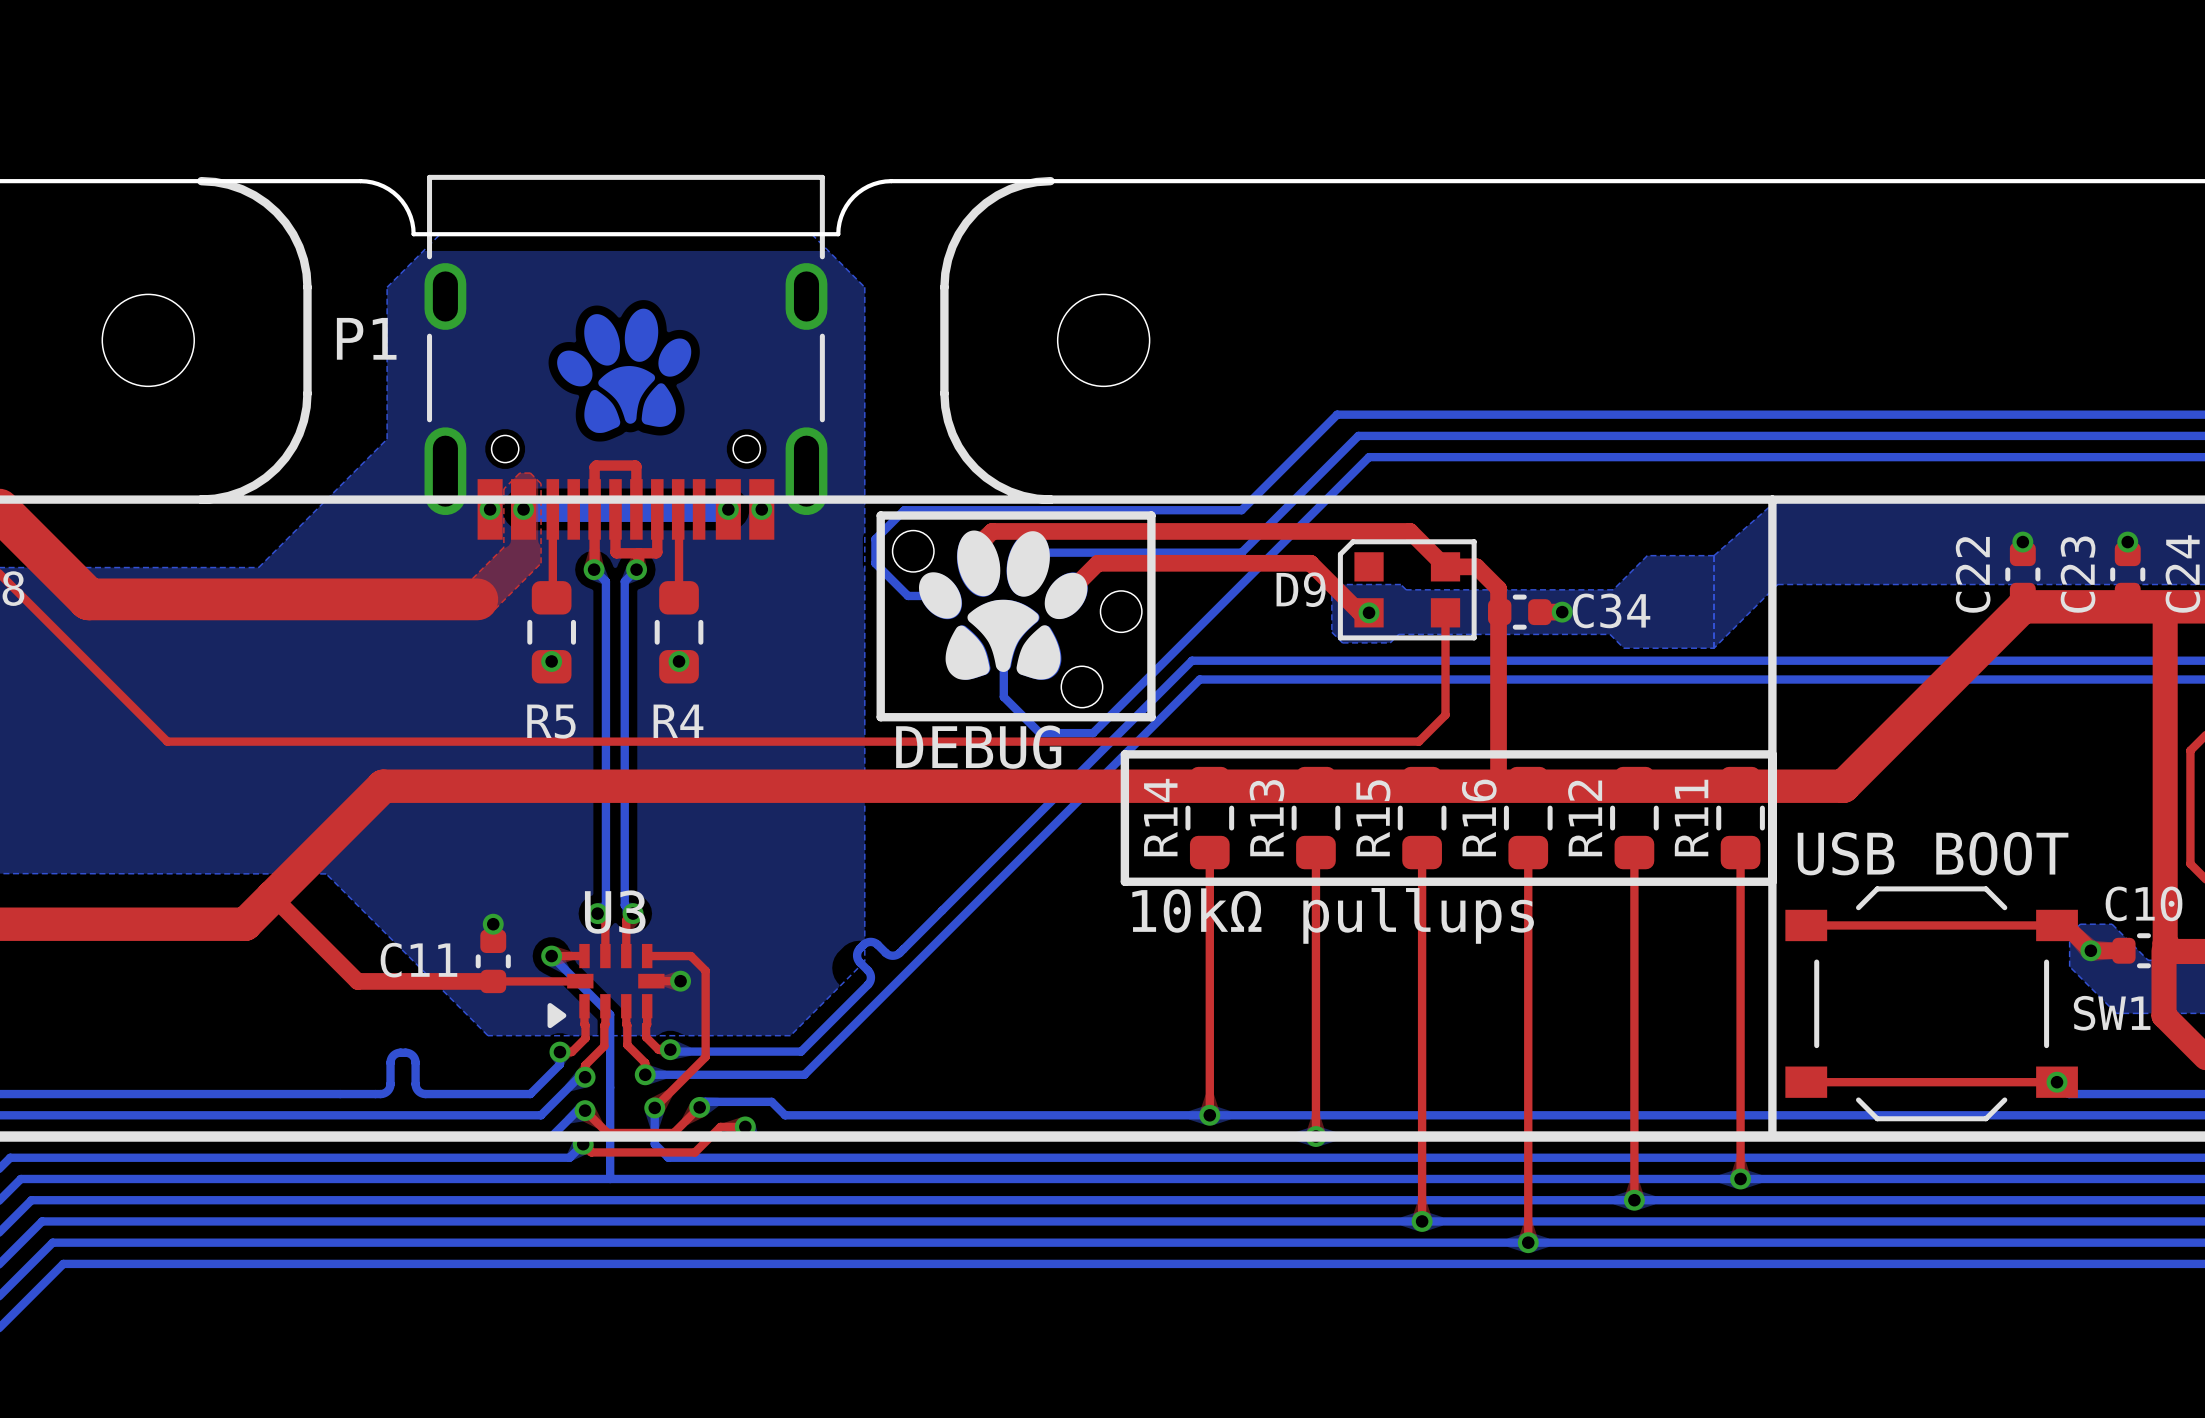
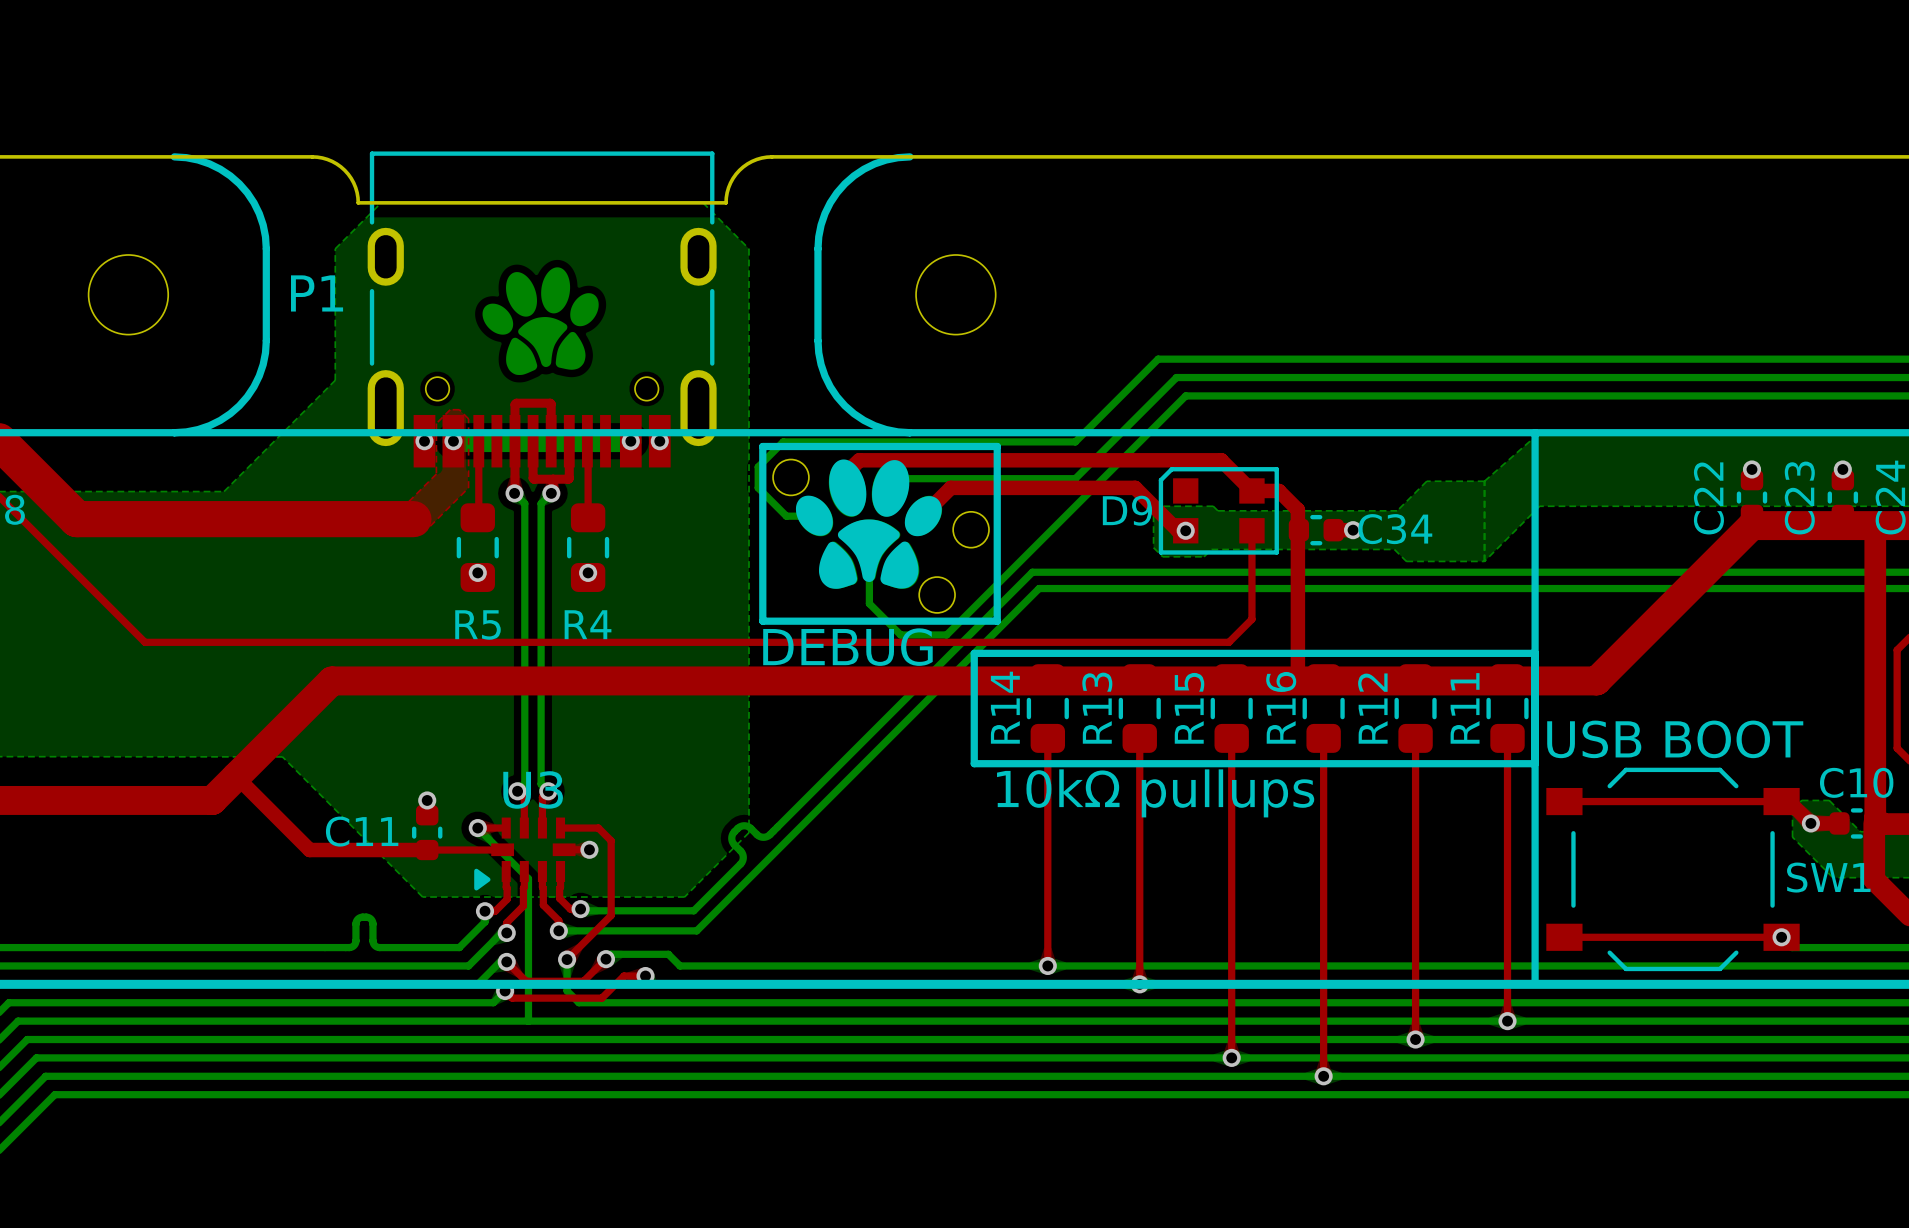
bottom track: (899, 952) (895, 955) (889, 955) (871, 941) (866, 942) (860, 948) (857, 954) (857, 959) (869, 972) (870, 978) (868, 983) (855, 997) -> (779, 825) (764, 837) (758, 836) (746, 826) (740, 826) (734, 831) (731, 837) (732, 841) (743, 855) (740, 864)
bottom track: (380, 1094) (386, 1091) (389, 1087) (391, 1058) (395, 1054) (400, 1052) (408, 1053) (414, 1058) (415, 1085) (418, 1091) (424, 1094) (438, 1094) -> (329, 947) (350, 947) (353, 945) (355, 941) (356, 922) (362, 917) (368, 917) (372, 920) (373, 942) (379, 947)

